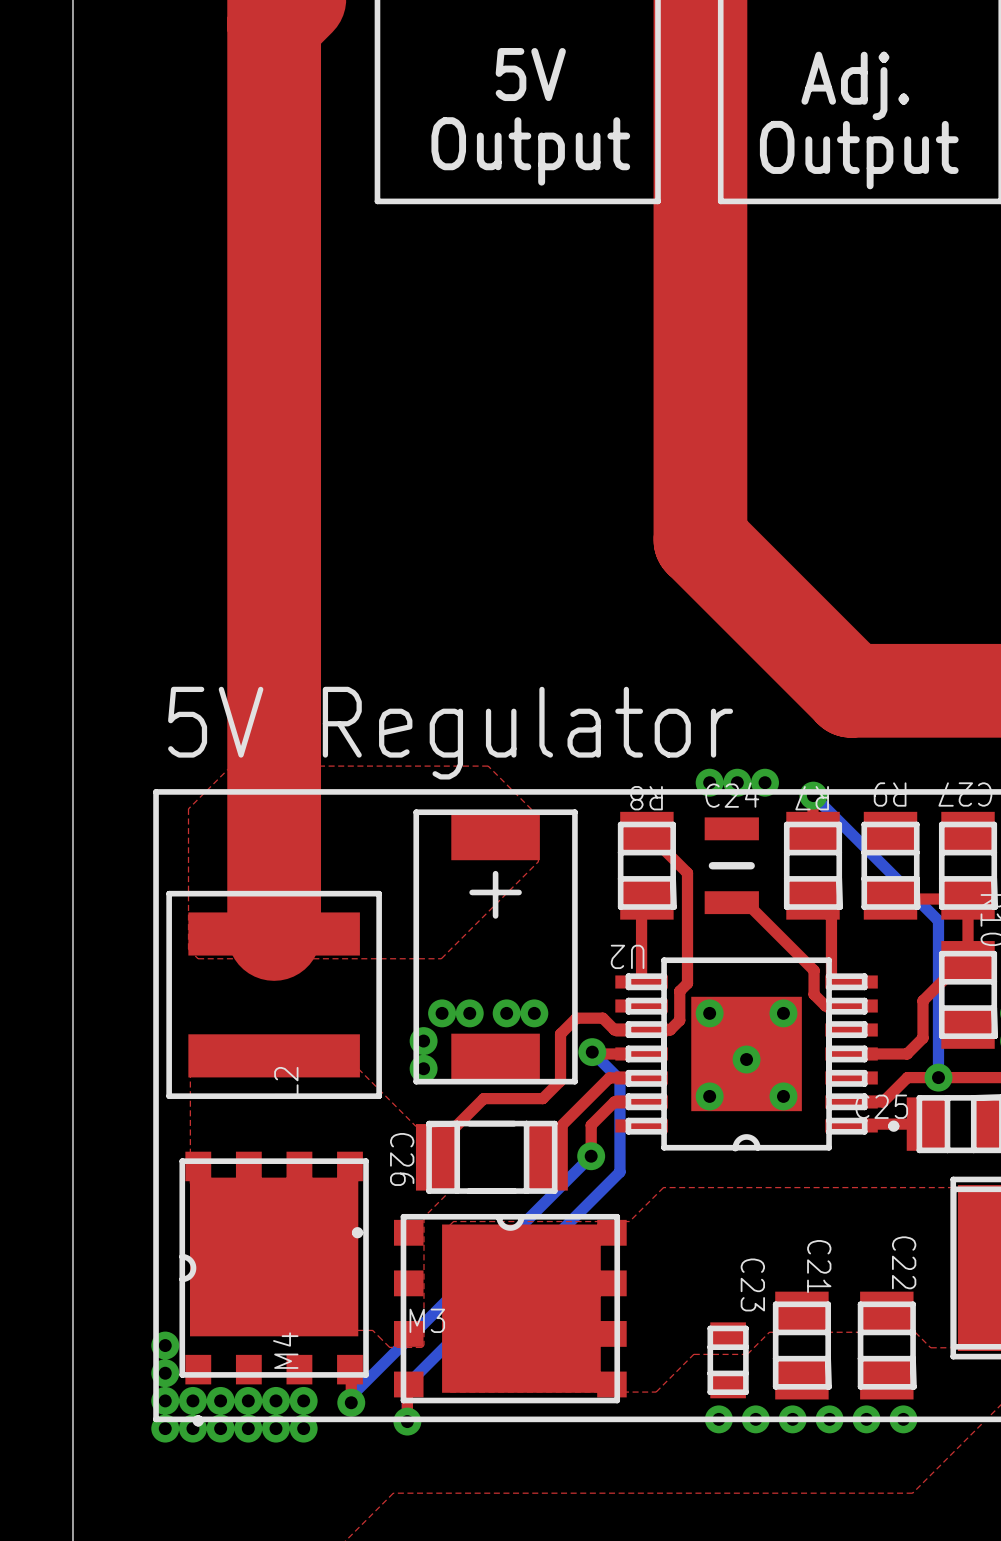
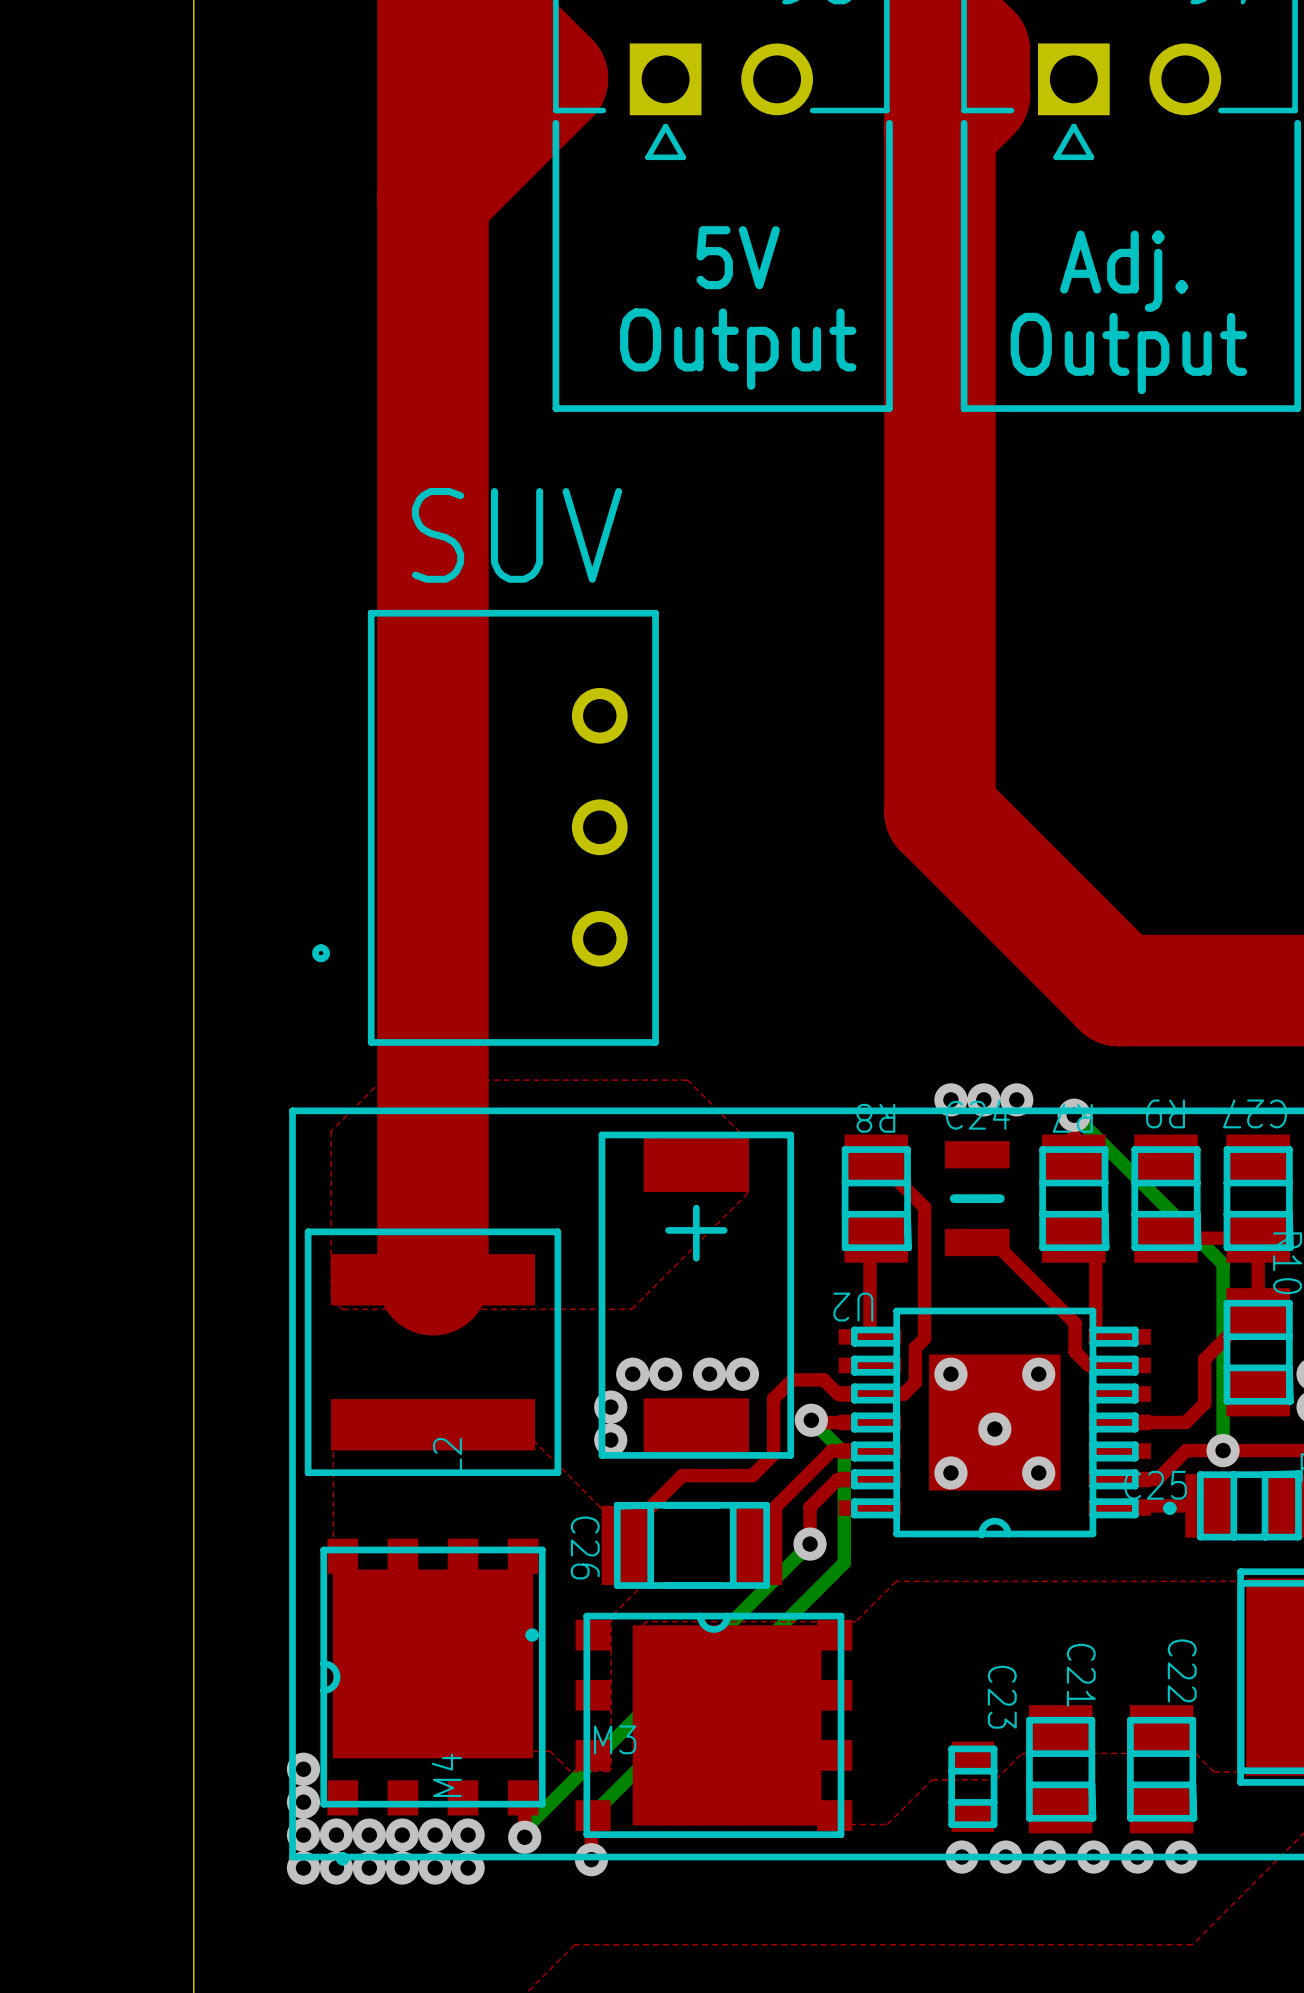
text: none -> SUV (517, 535)
part: none -> (485, 827)
text: 5V Regulator (450, 733) -> none

